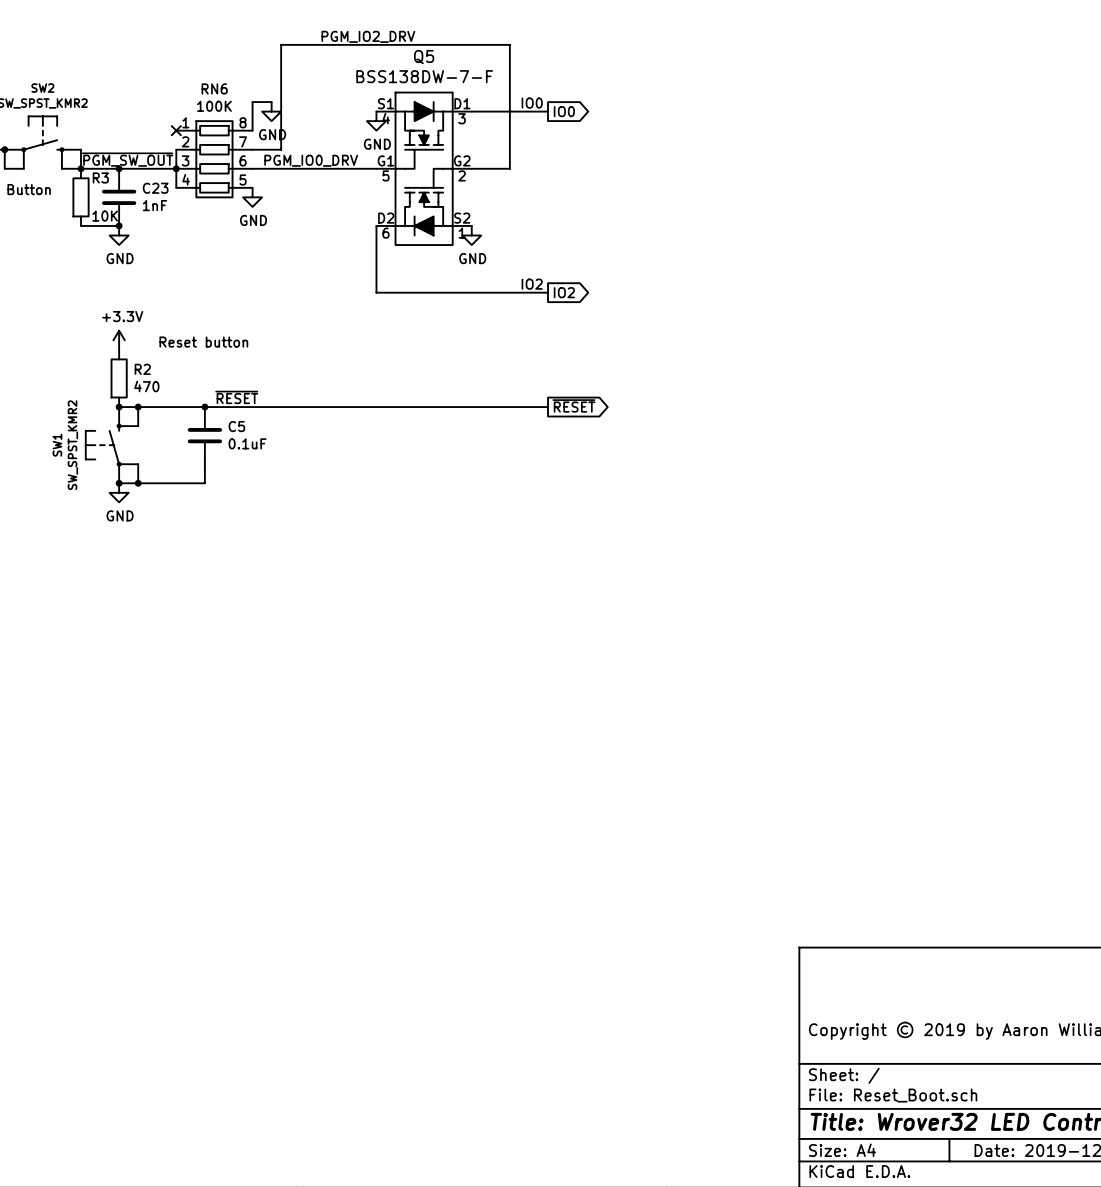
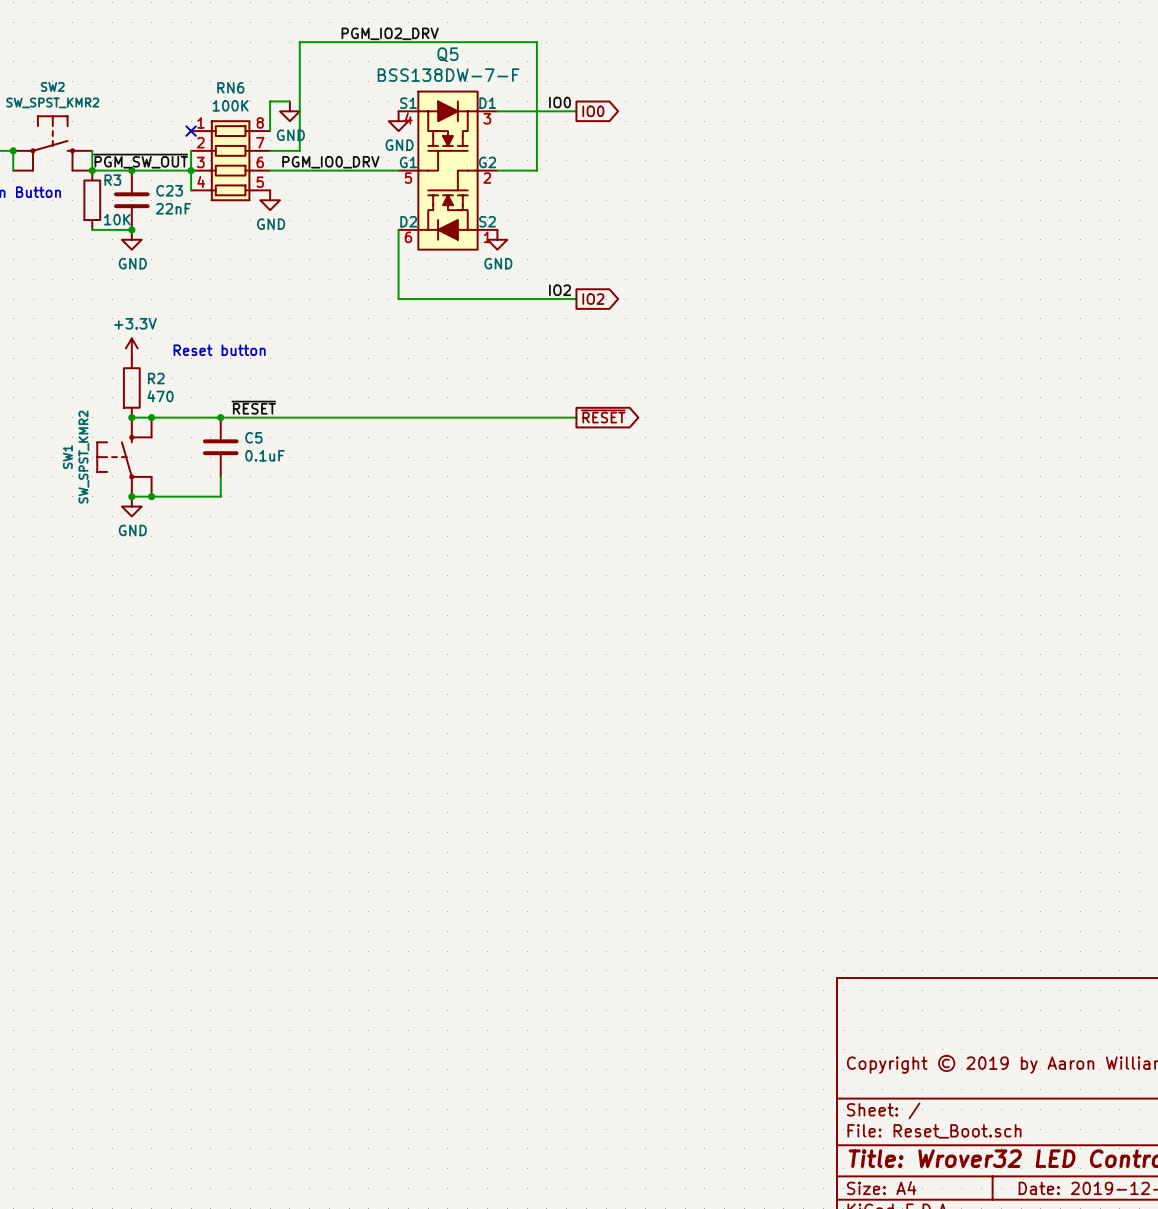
C23 value: 1nF (154, 205) -> 22nF (173, 208)

